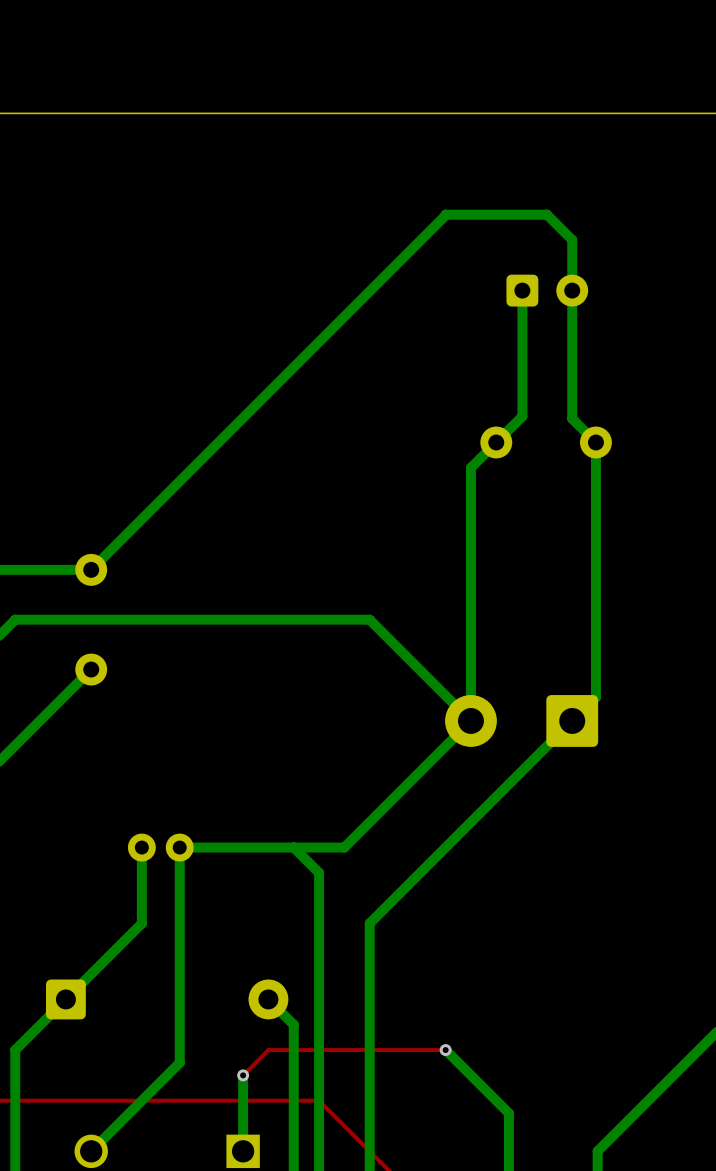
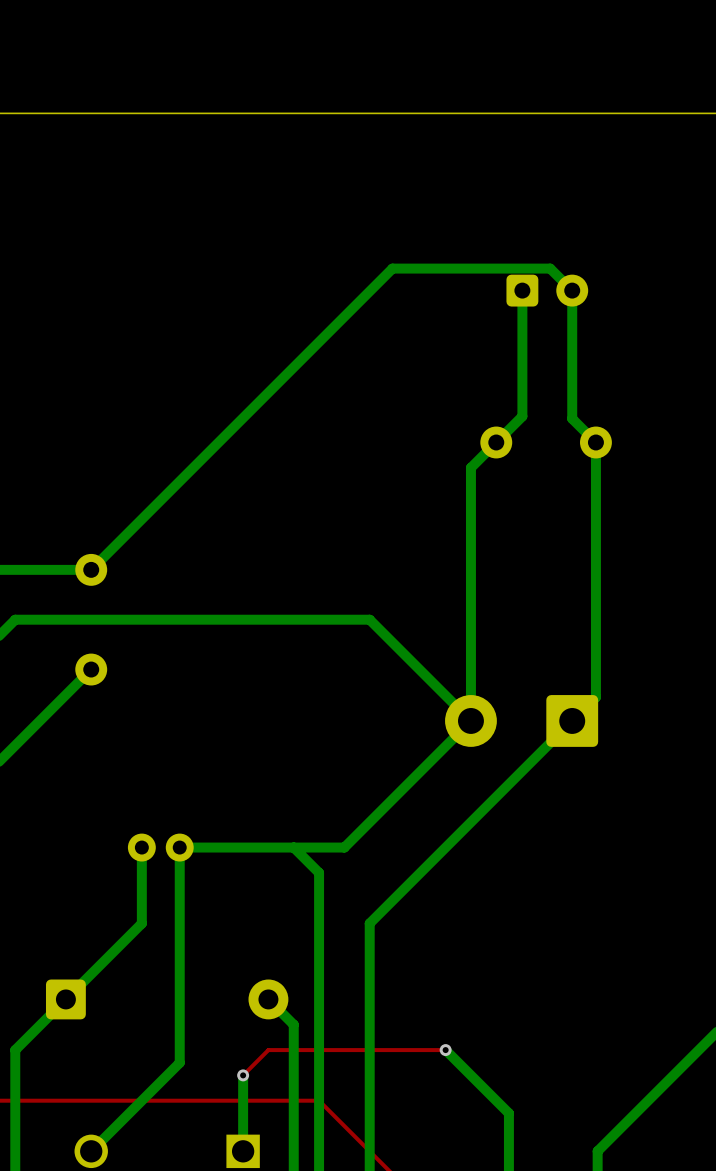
bottom track: (392, 268) (445, 214) (546, 214) (572, 239) (572, 290) -> (392, 268) (550, 268) (572, 290)

